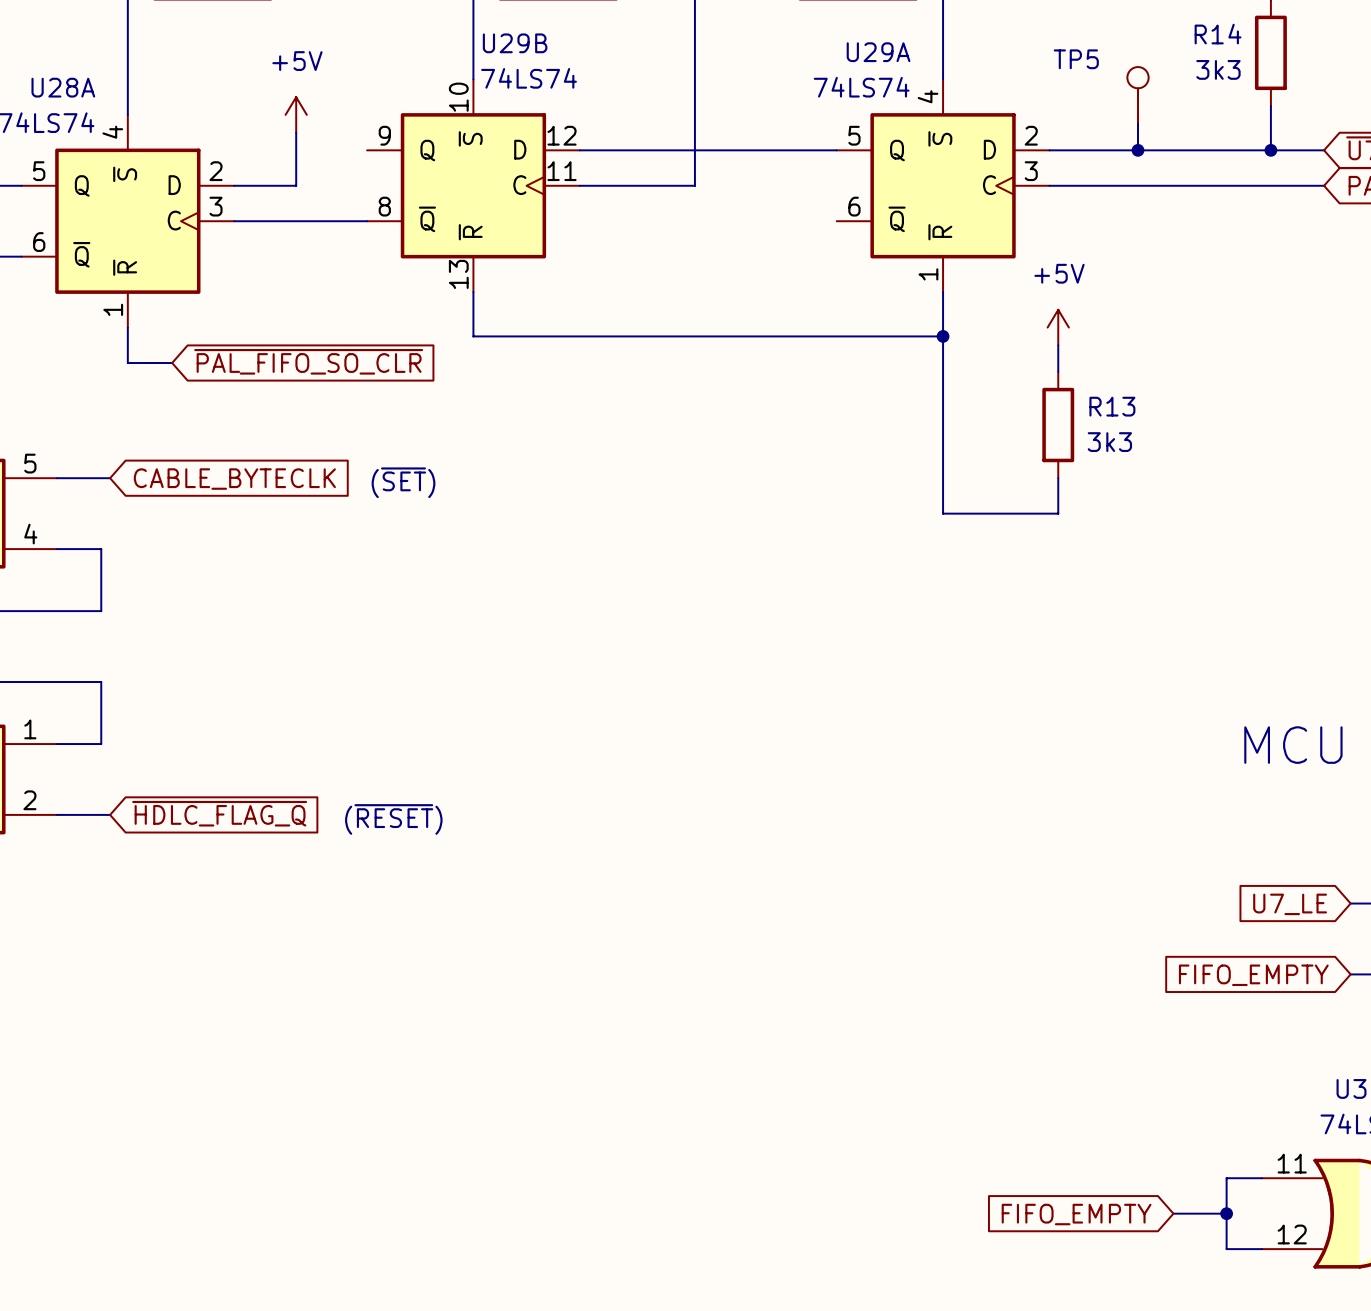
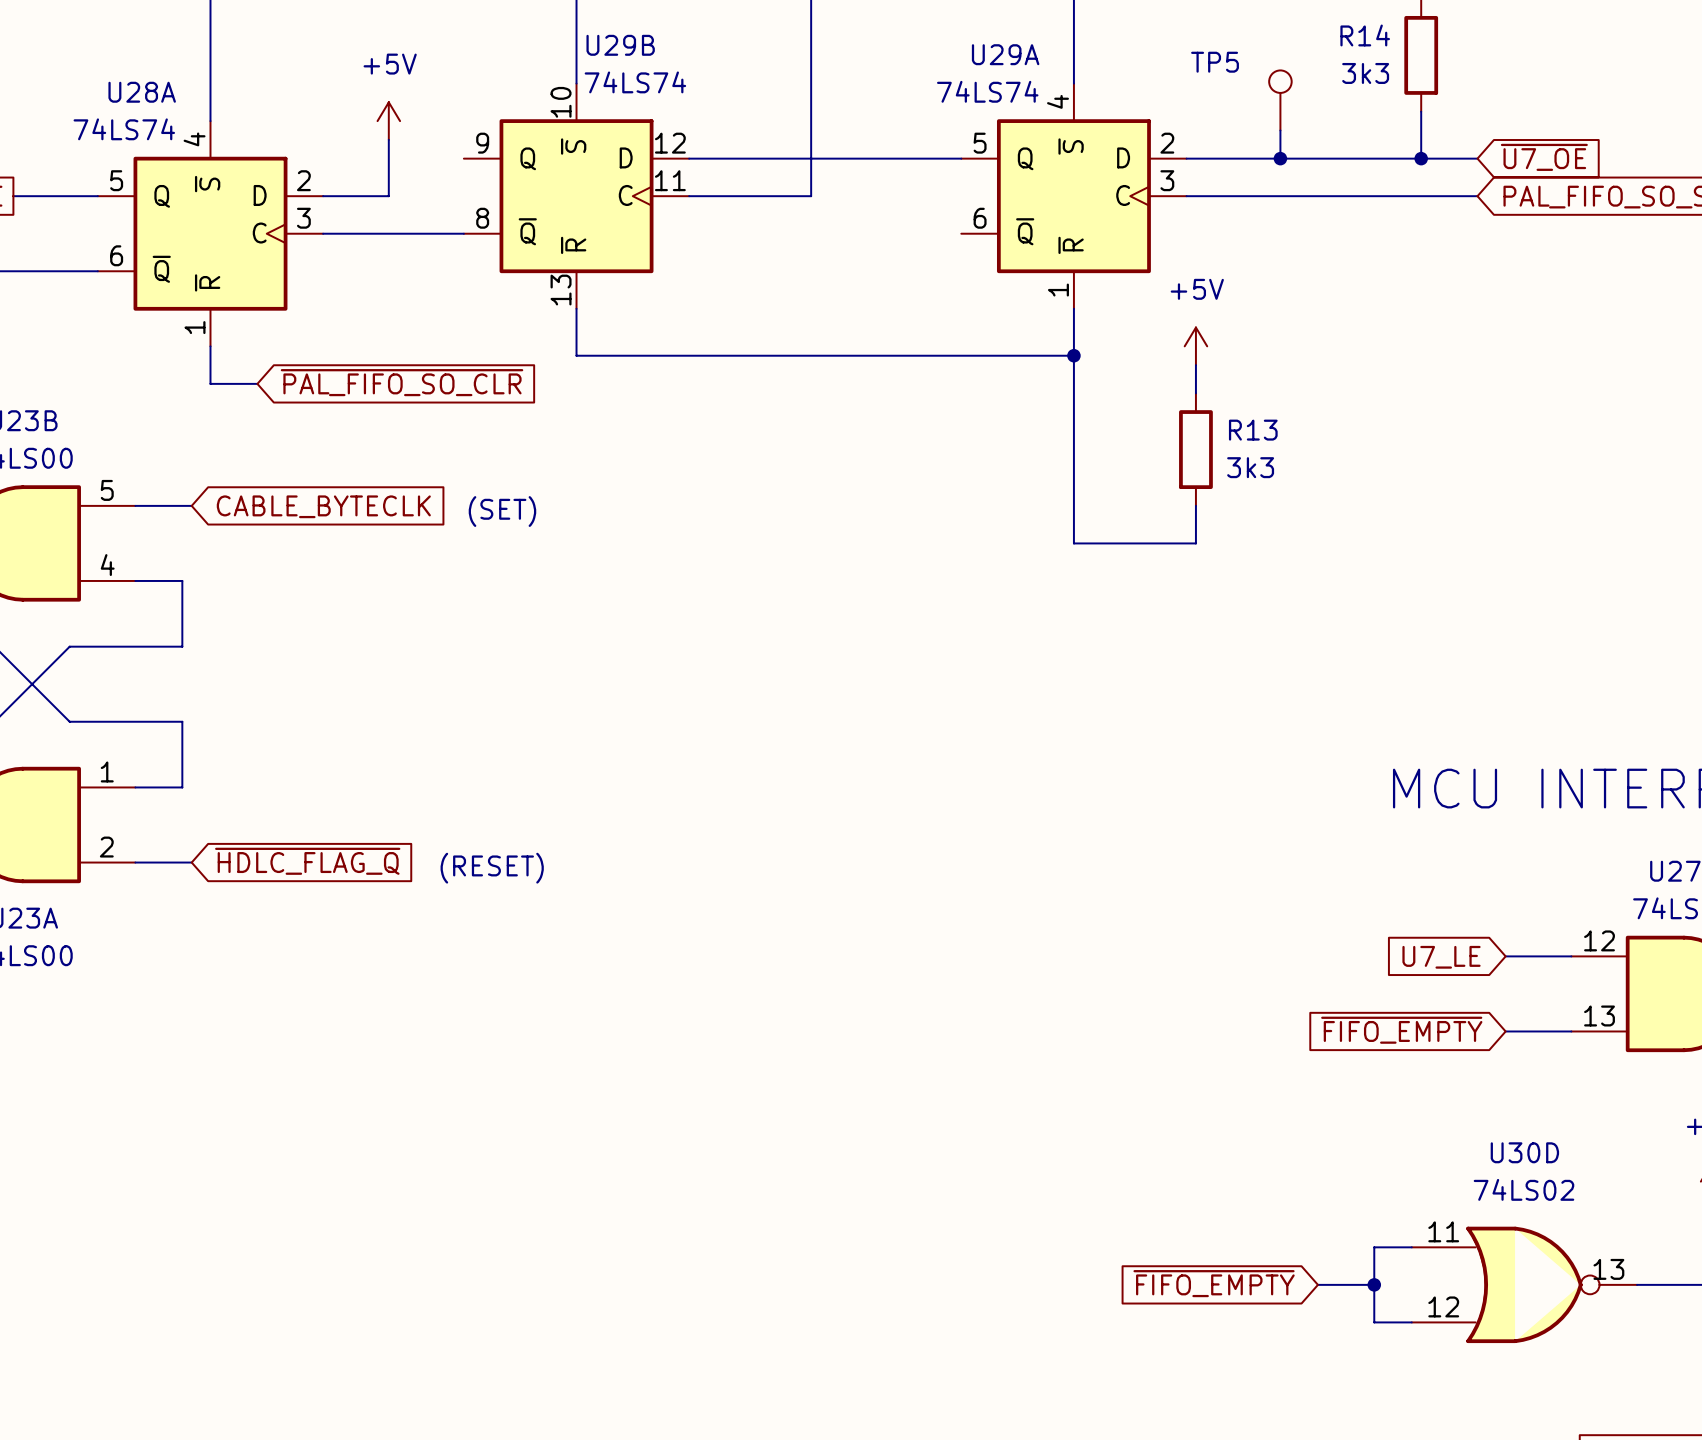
text: (~{SET}) (403, 482) -> (SET) (502, 511)
text: (~{RESET}) (393, 819) -> (RESET) (492, 868)
global label: FIFO_EMPTY (1253, 975) -> ~{FIFO_EMPTY} (1401, 1030)
global label: FIFO_EMPTY (1076, 1214) -> ~{FIFO_EMPTY} (1214, 1283)

